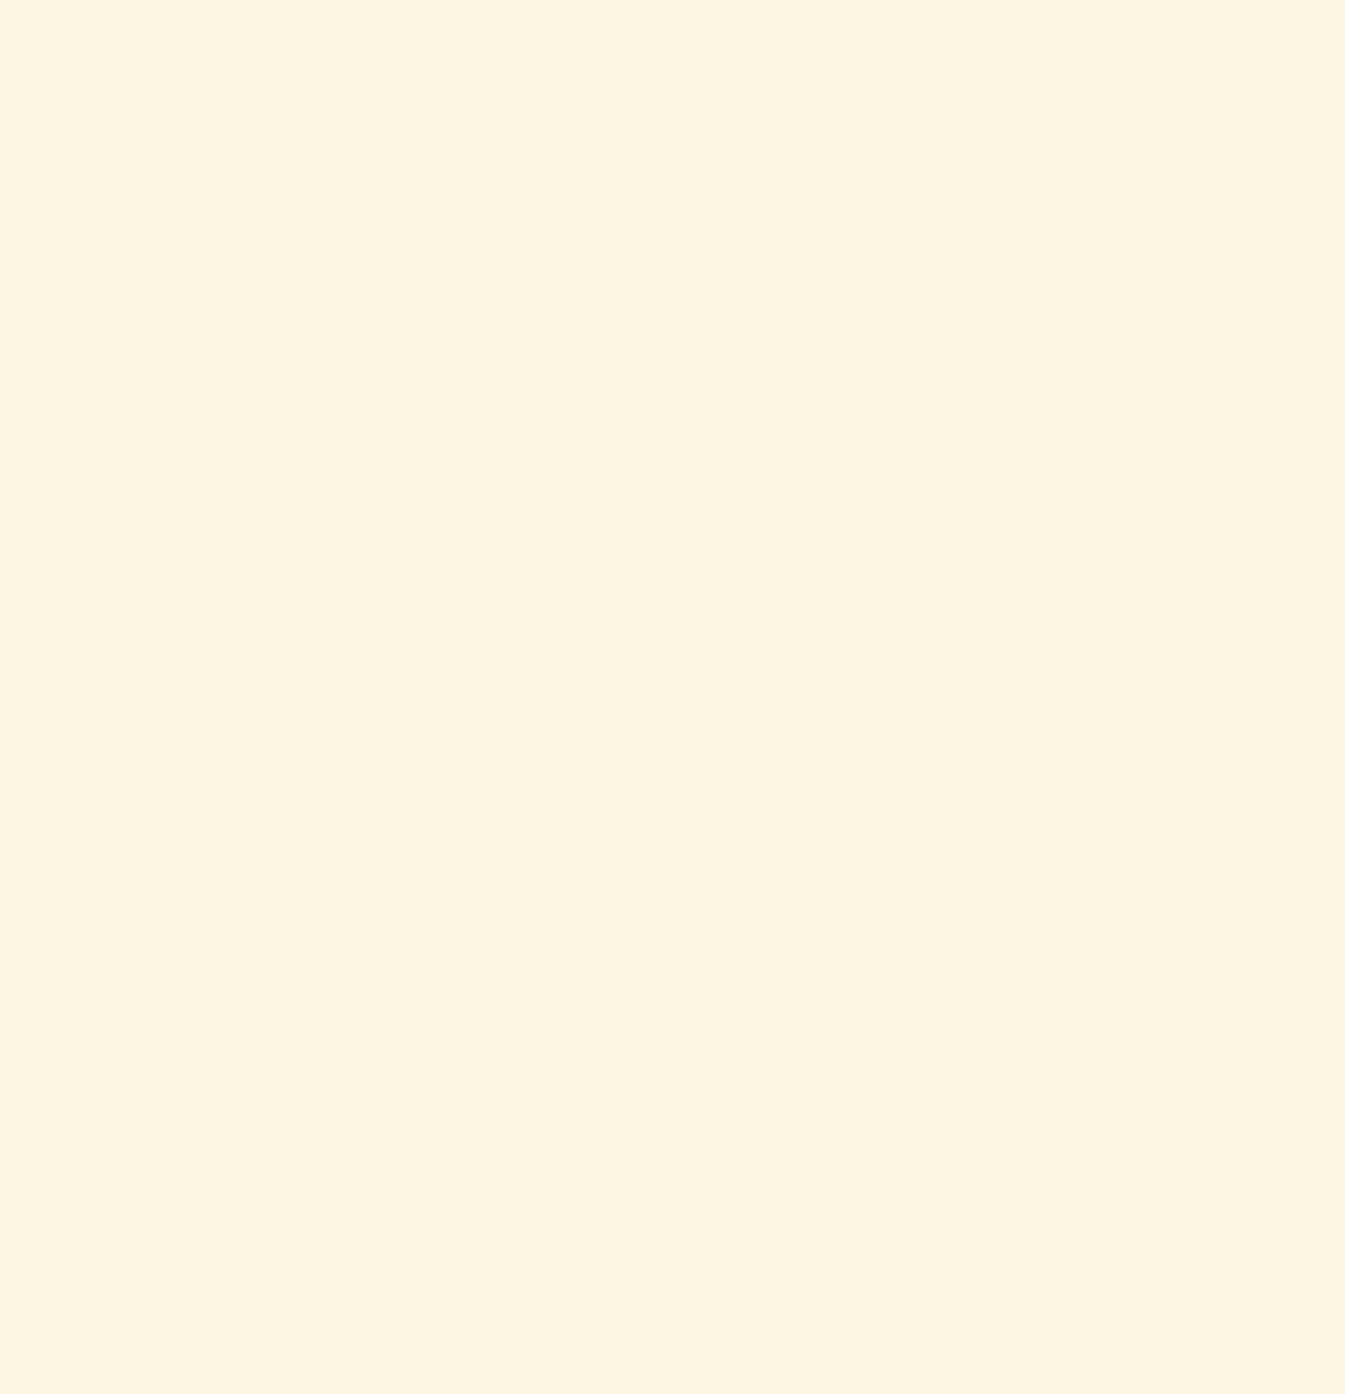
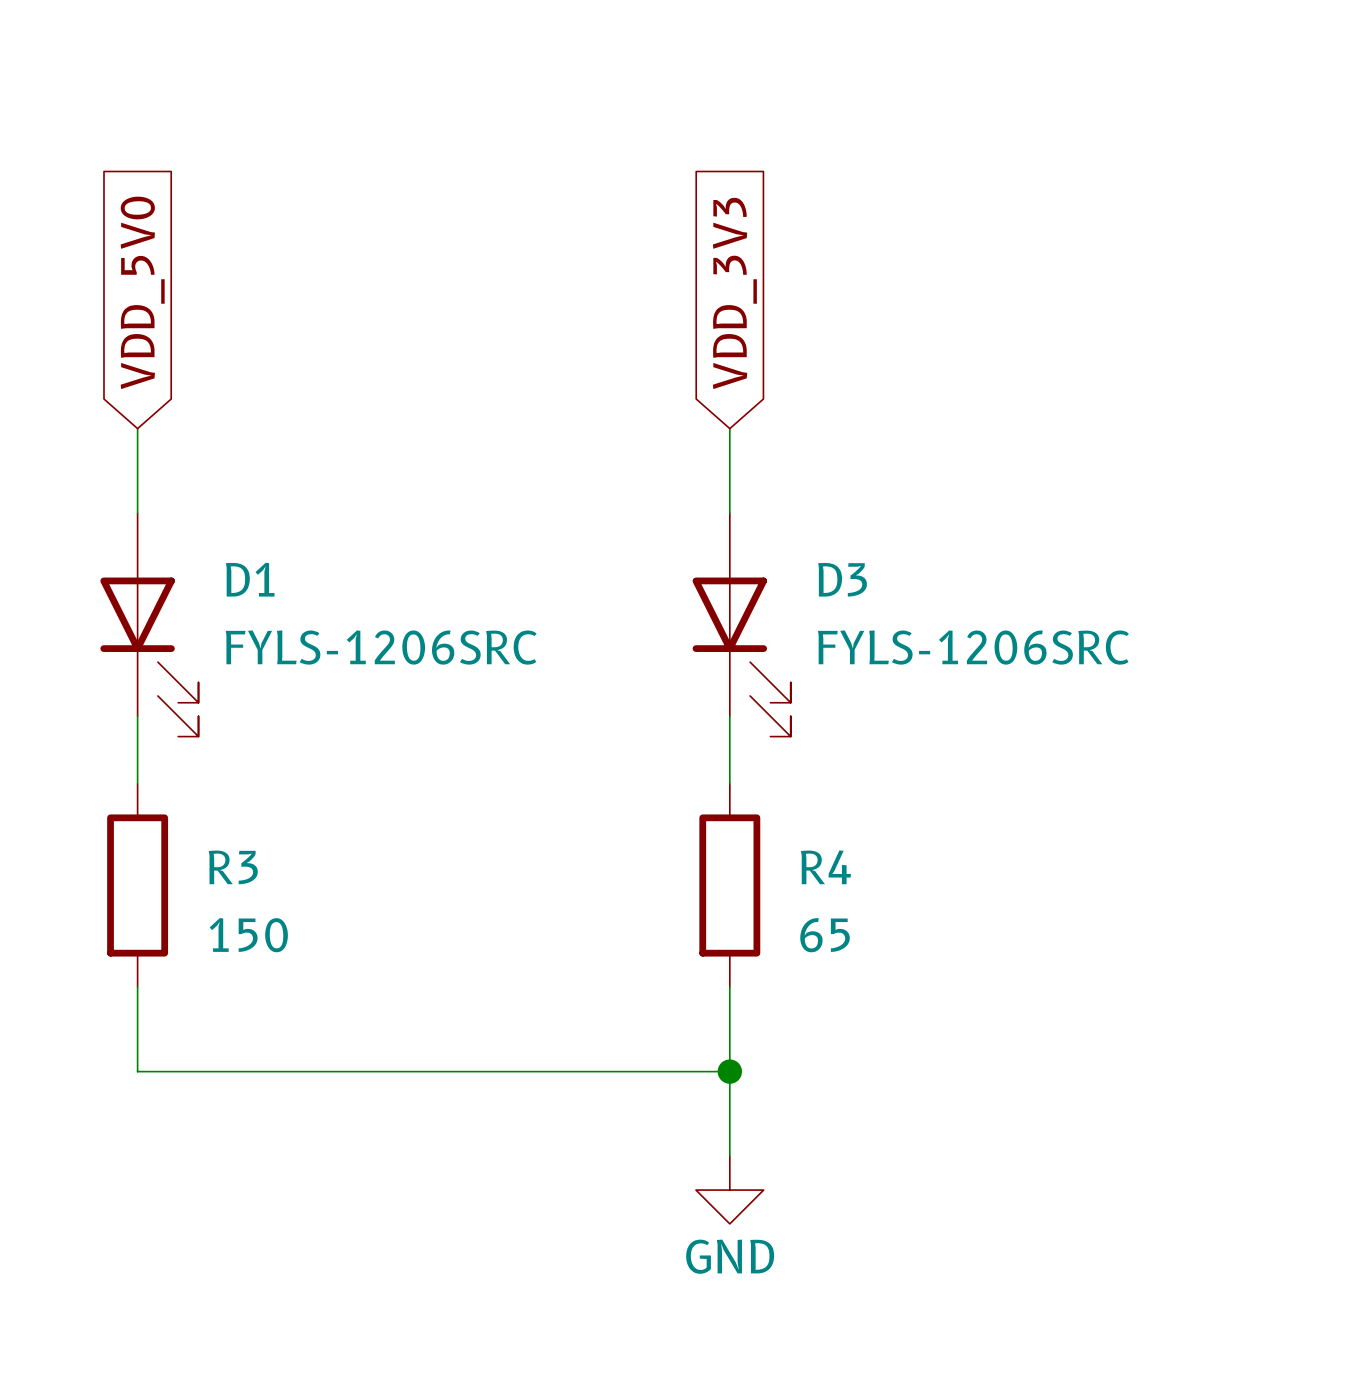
global label: none -> VDD_5V0 (142, 292)
global label: none -> VDD_3V3 (734, 293)
wire: none -> (137, 428) (137, 513)
wire: none -> (729, 428) (729, 513)
D1: none -> FYLS-1206SRC (149, 624)
D3: none -> FYLS-1206SRC (741, 624)
wire: none -> (137, 716) (137, 783)
wire: none -> (729, 716) (729, 783)
R3: none -> 150 (137, 885)
R4: none -> 65 (729, 885)
wire: none -> (137, 987) (137, 1071) (729, 1071)
wire: none -> (729, 987) (729, 1156)
junction: none -> (729, 1071)
power symbol: none -> GND (729, 1190)

